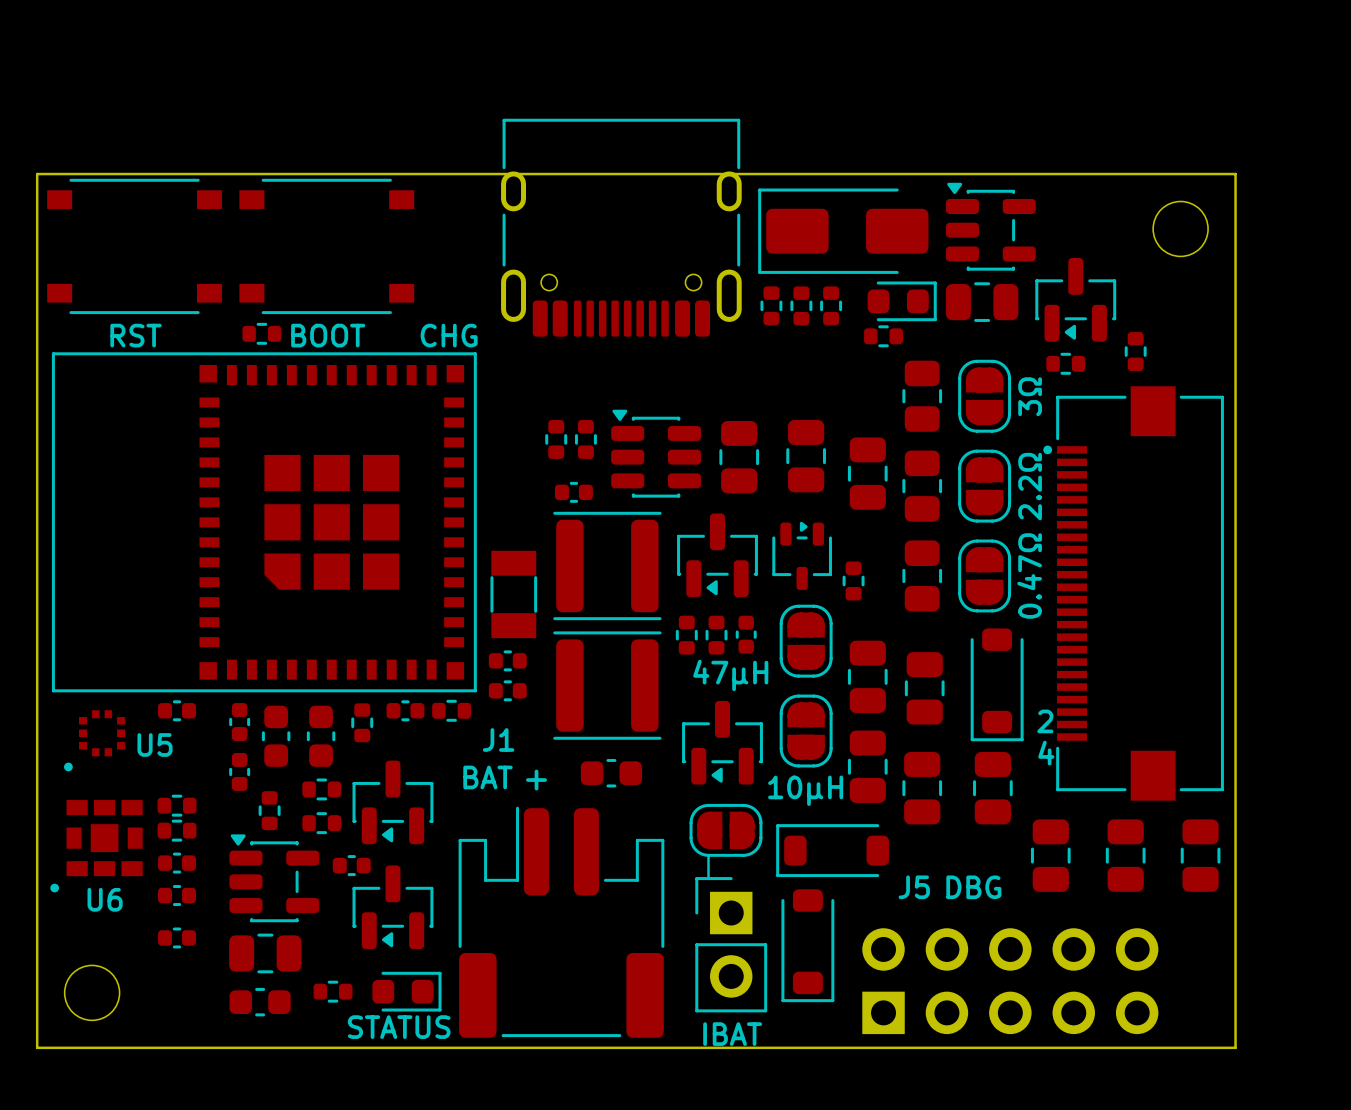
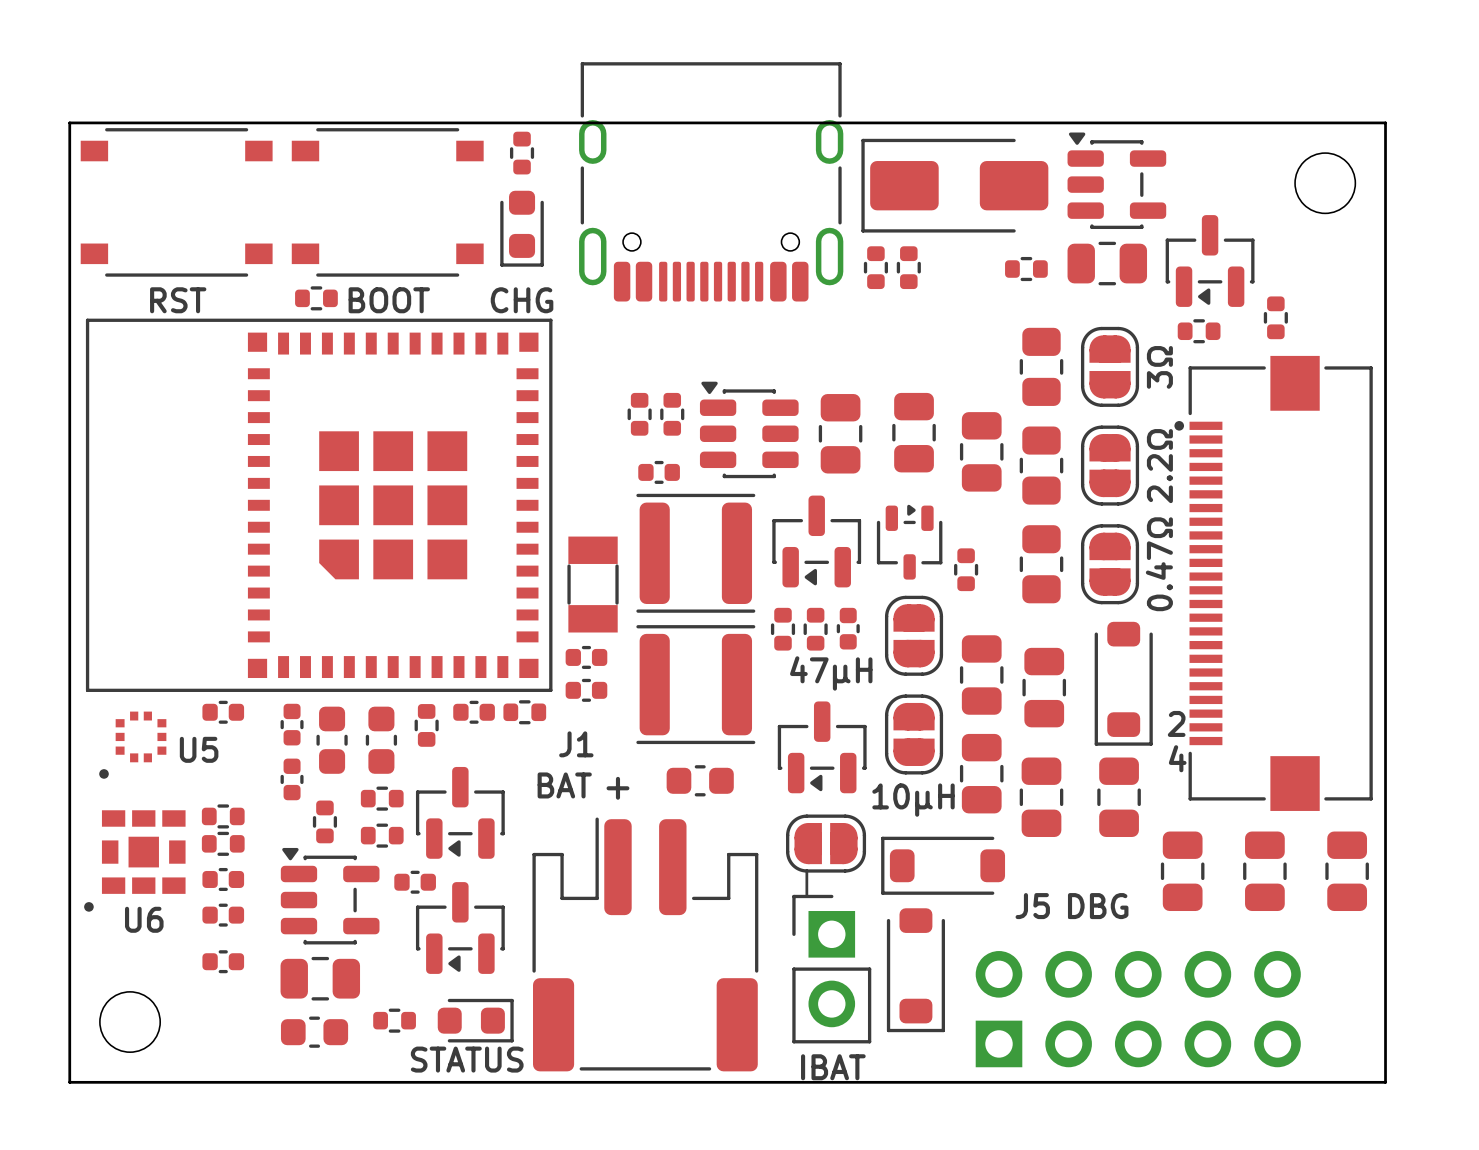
part: none -> (522, 153)
part: none -> (522, 228)
part footprint: [867, 281, 937, 322] -> [1005, 256, 1048, 282]
part: (831, 305) -> none
part: (883, 336) -> none

